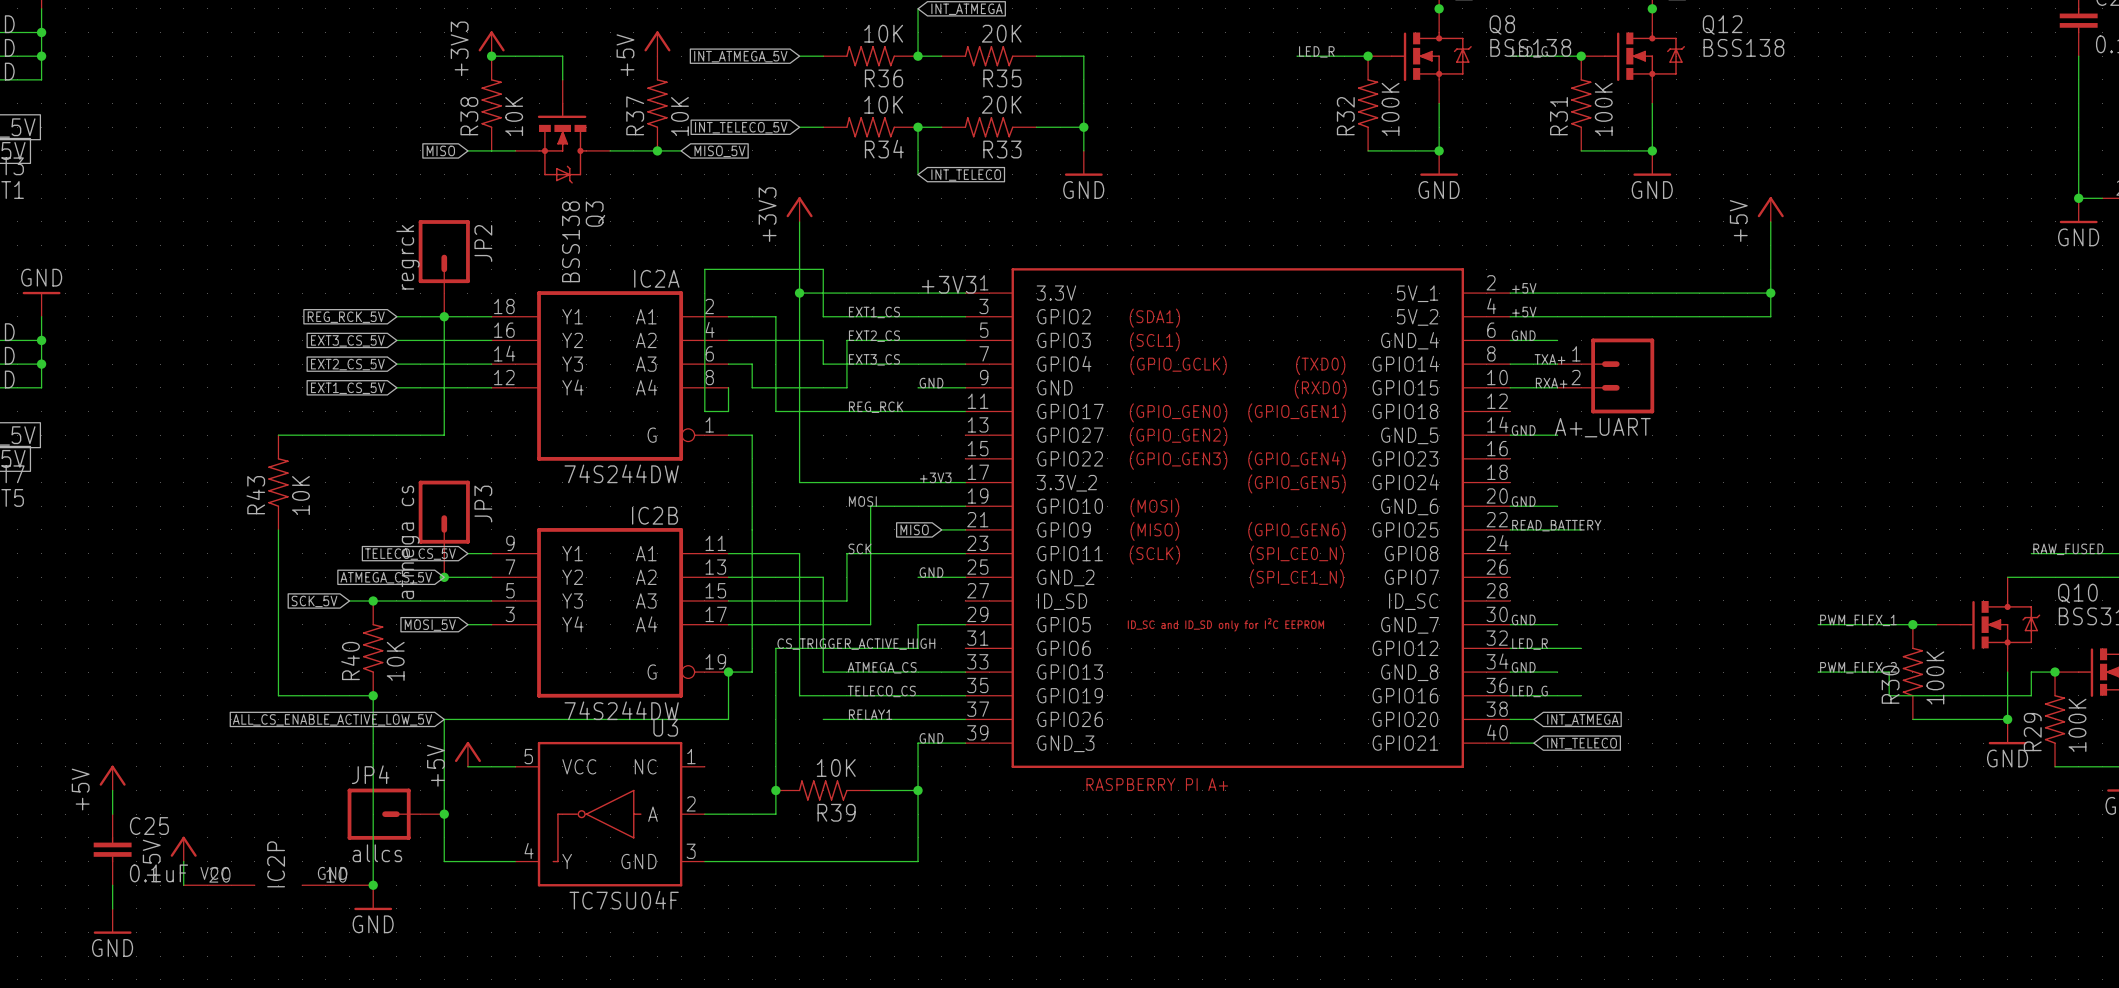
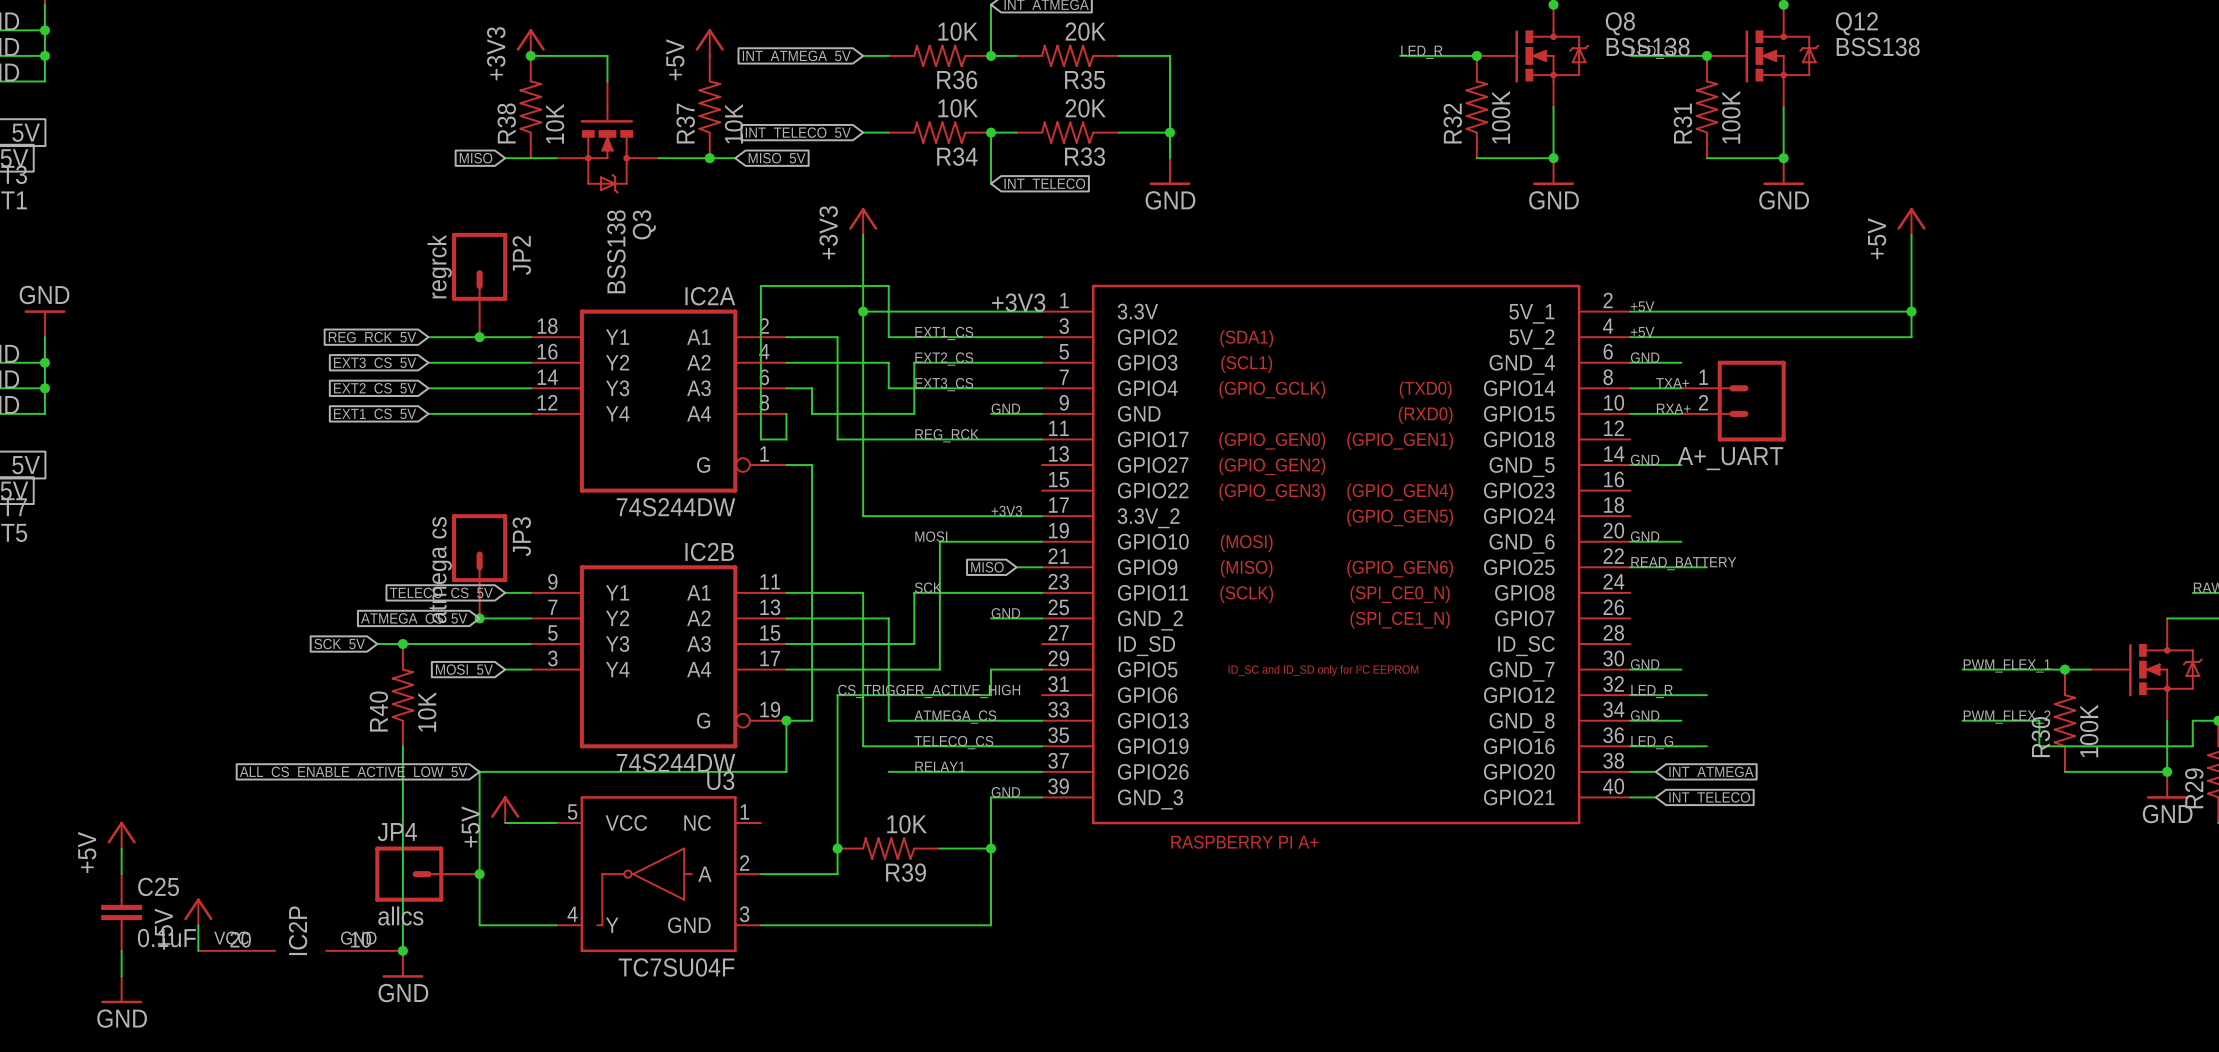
wire: (444, 316) (444, 435) (278, 435) -> none
R43: 10K (278, 482) -> none
wire: (278, 529) (278, 695) (373, 695) -> none
junction: (373, 695) -> none

